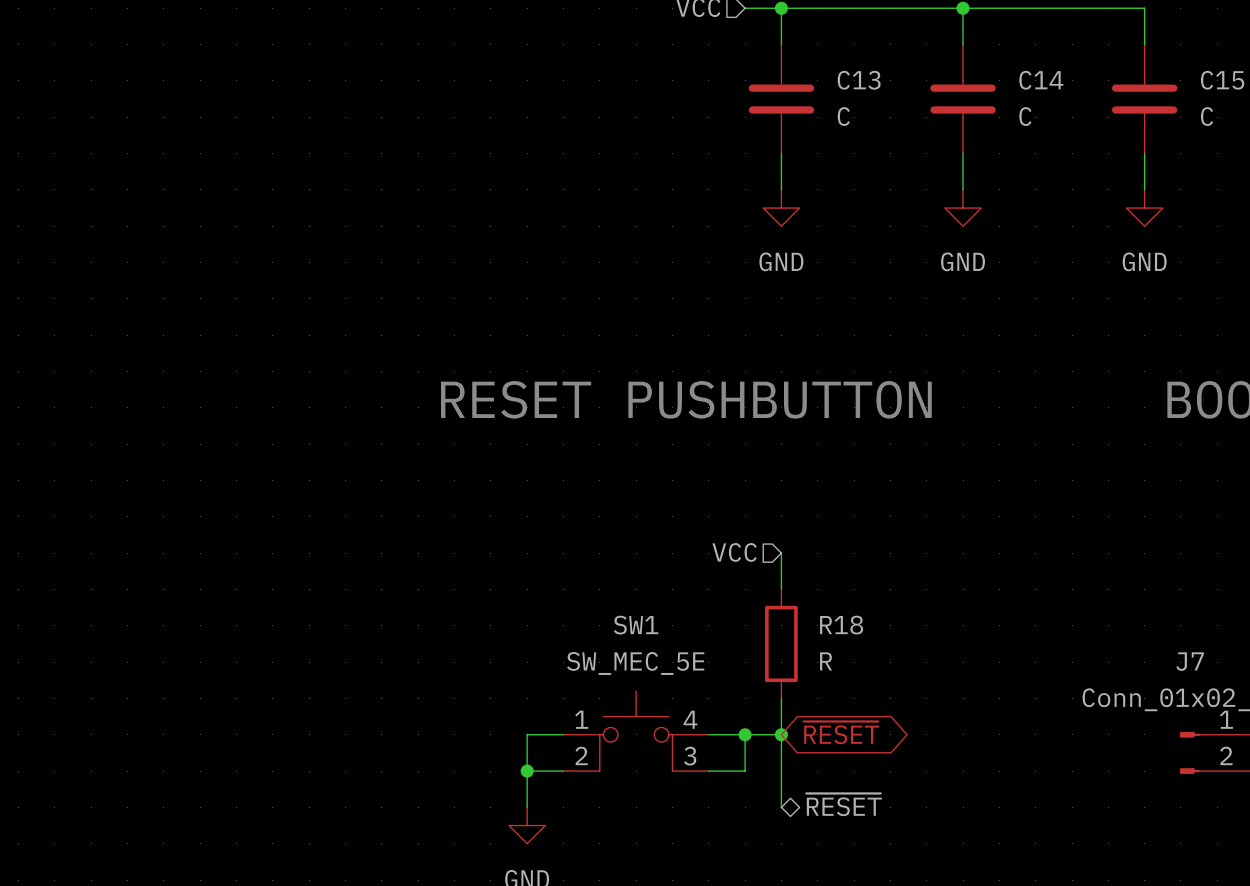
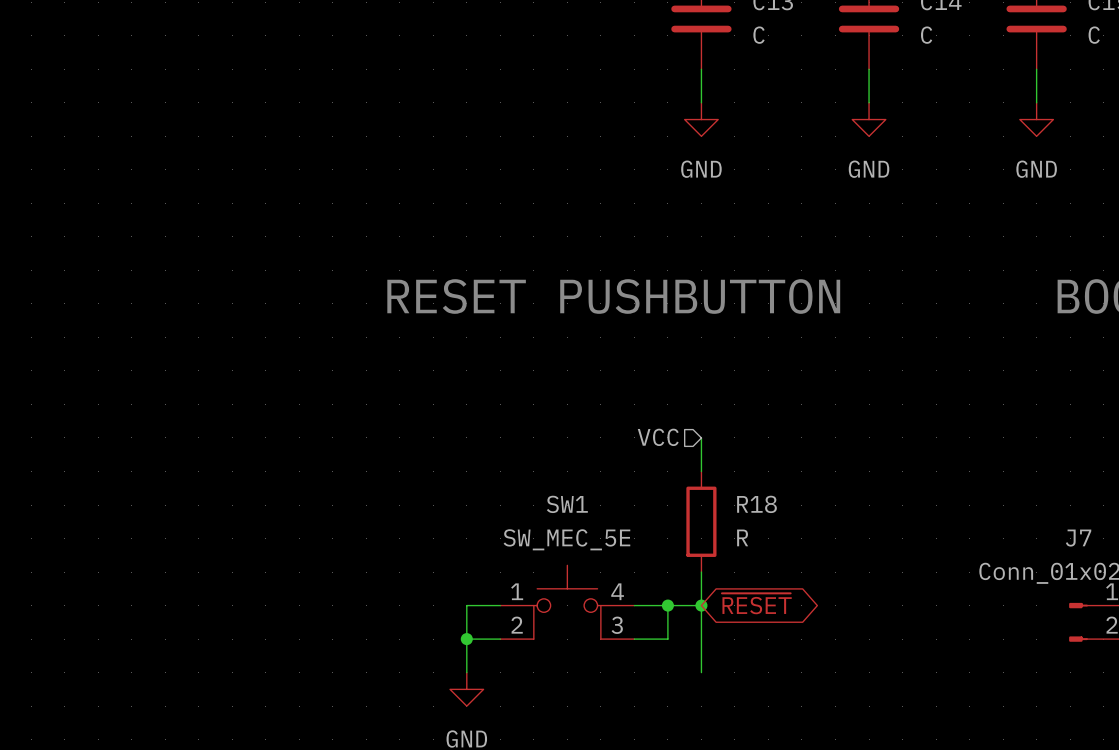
hierarchical label: ~{RESET} (844, 804) -> none

